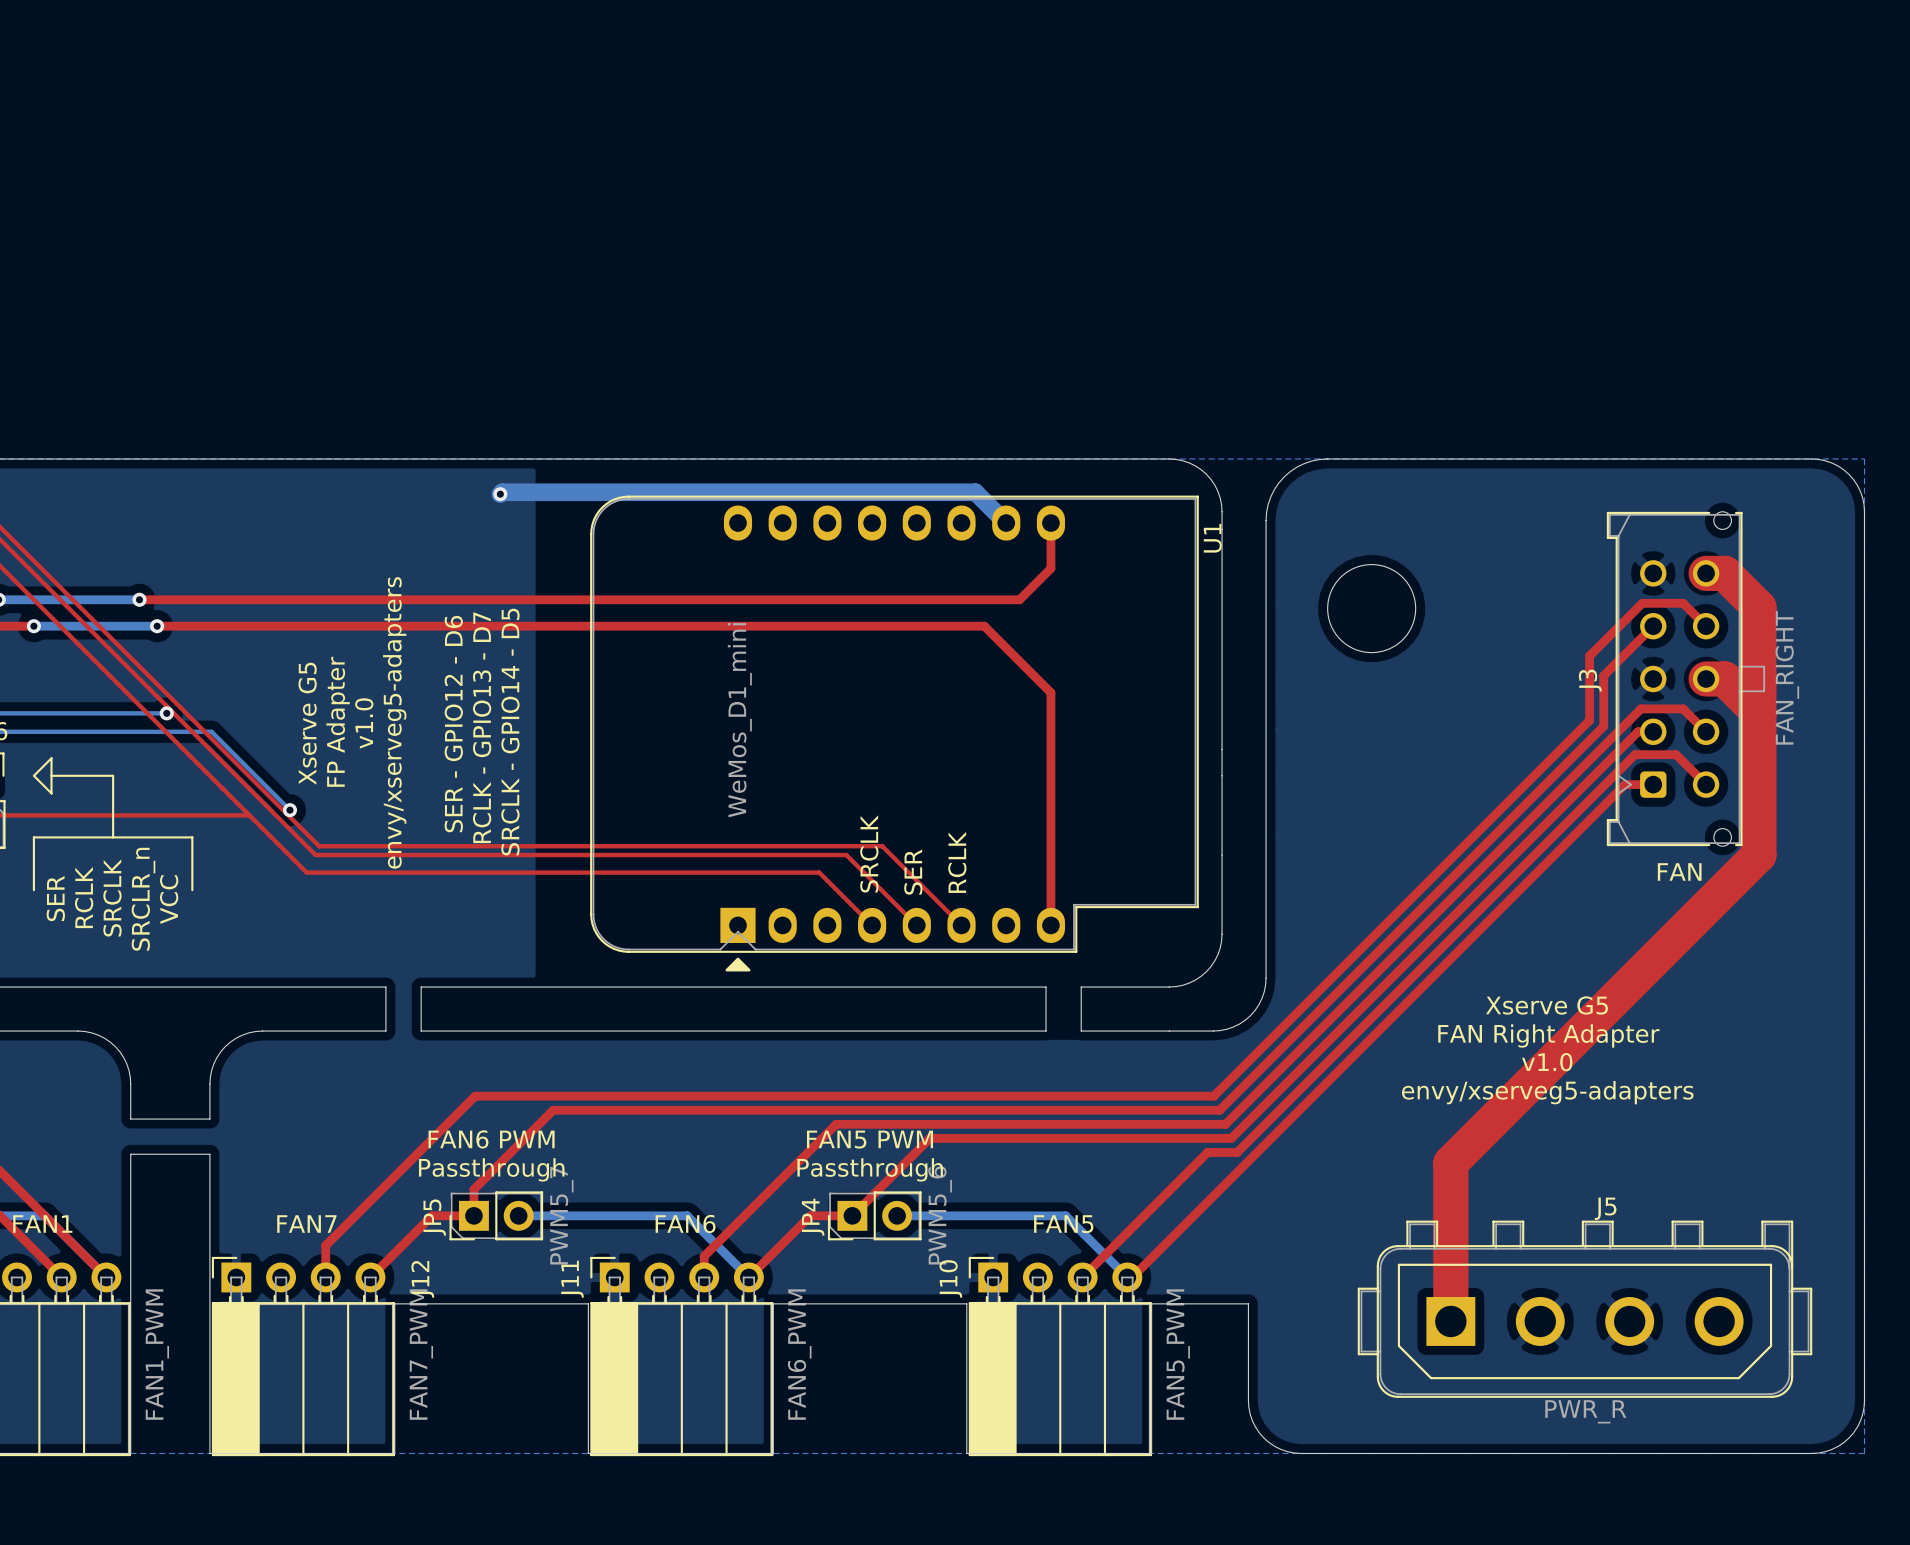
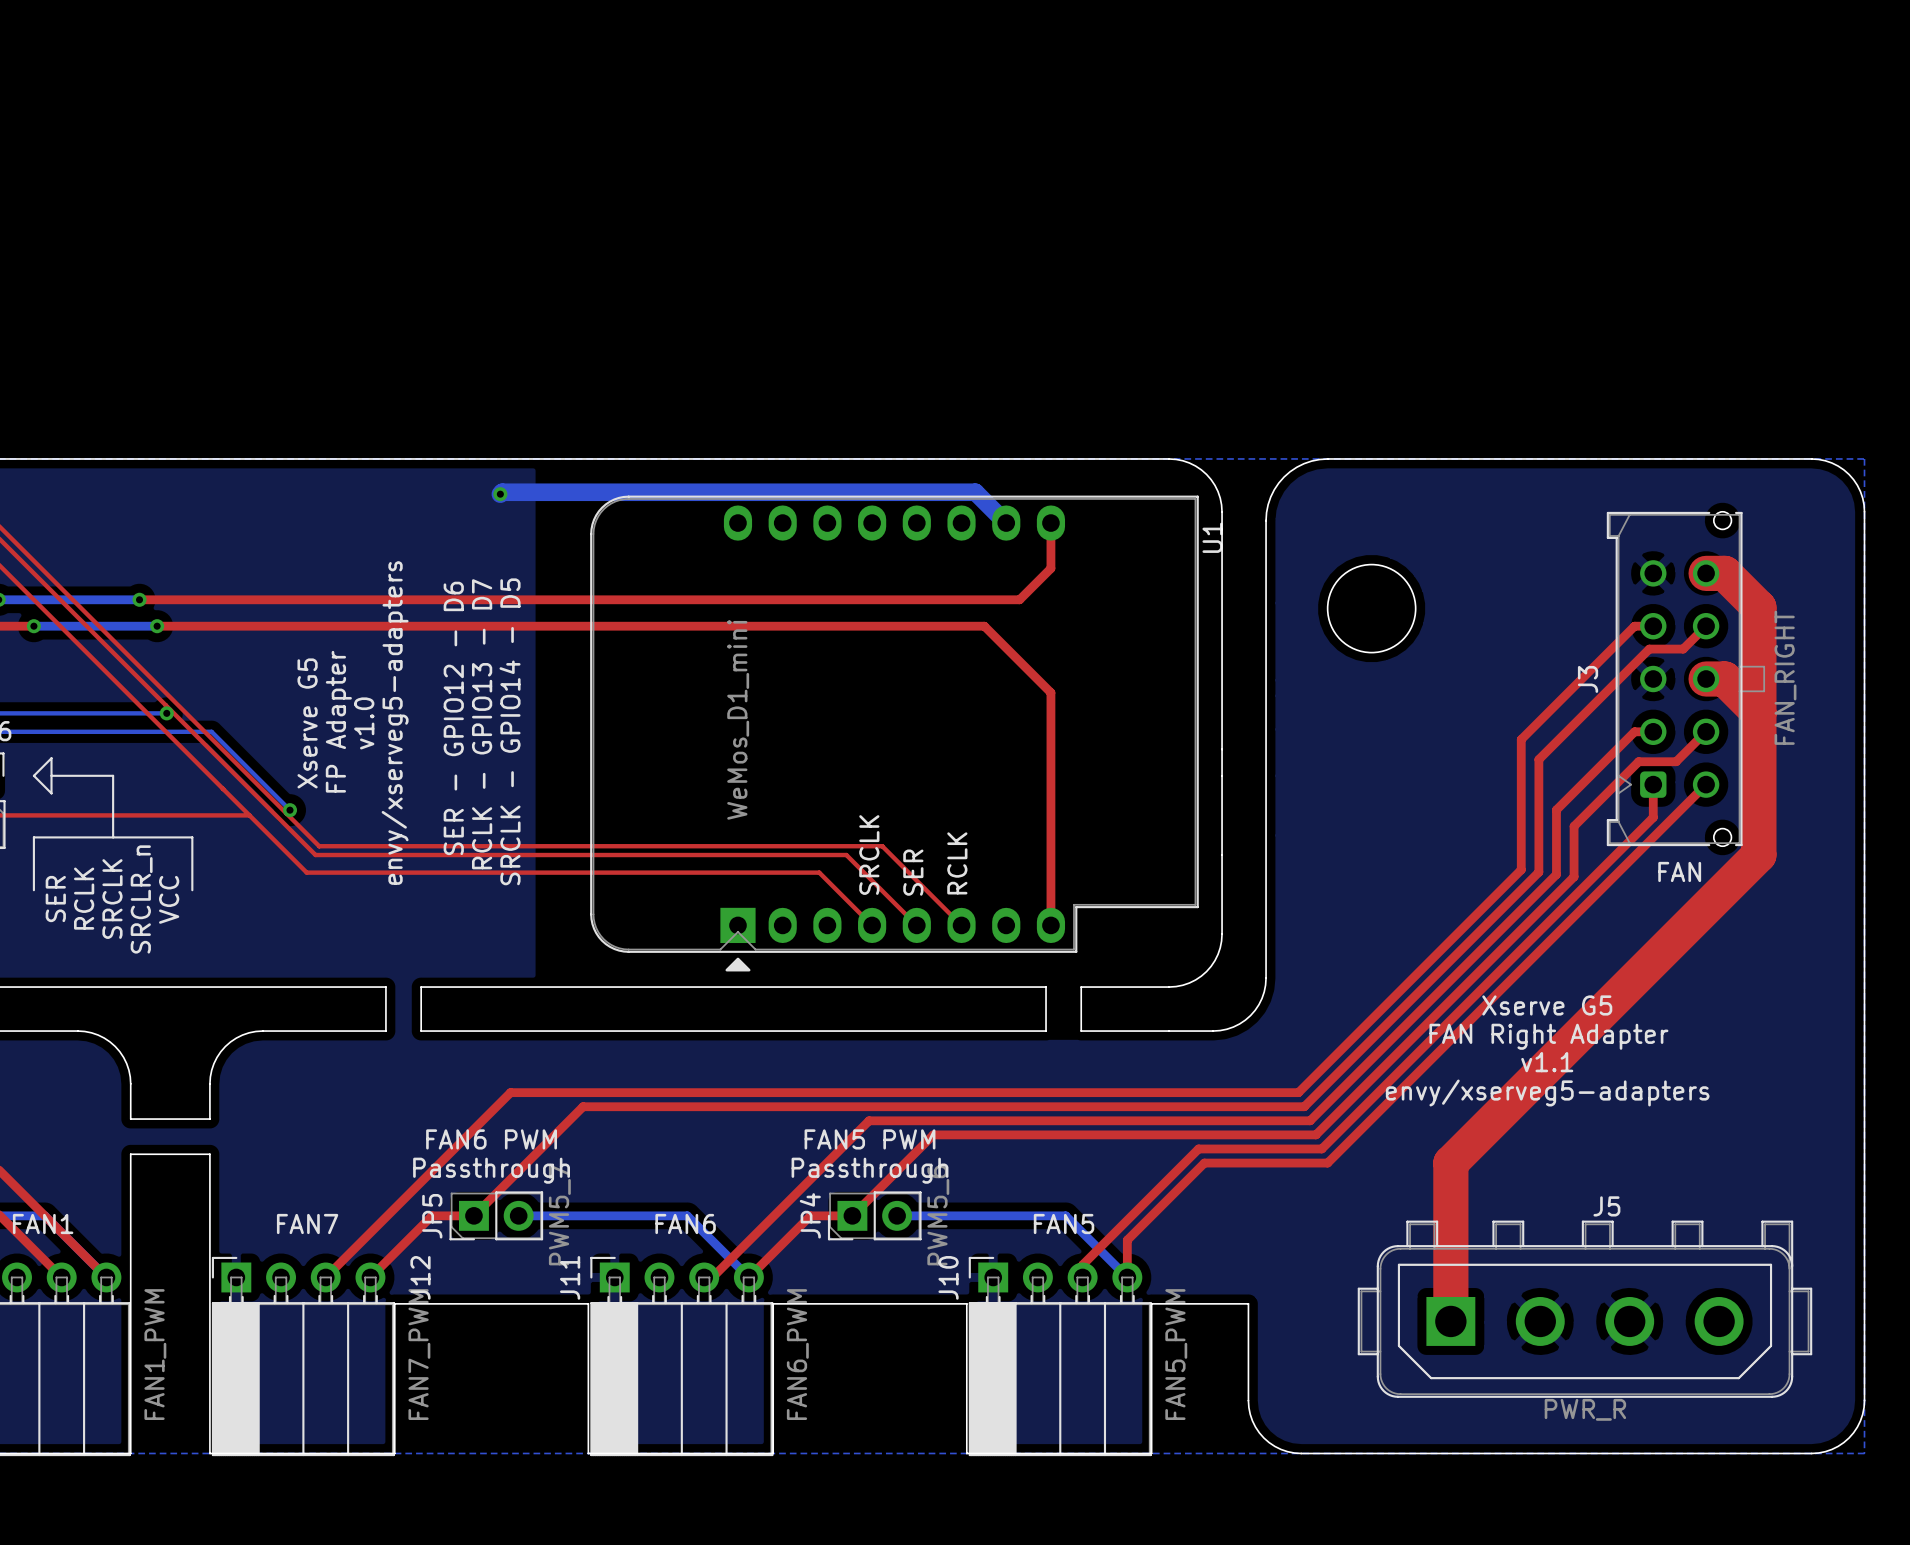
top track: (1653, 626) (1603, 675) (1603, 726) (1219, 1110) (553, 1110) (473, 1189) (473, 1215) -> (1706, 626) (1683, 649) (1649, 649) (1538, 759) (1538, 872) (1304, 1106) (583, 1106) (473, 1215)
top track: (1706, 626) (1683, 603) (1642, 603) (1589, 655) (1589, 720) (1213, 1096) (475, 1096) (325, 1245) (325, 1277) -> (1653, 626) (1634, 626) (1521, 739) (1521, 869) (1298, 1092) (510, 1092) (325, 1277)
top track: (1637, 731) (1231, 1138) (929, 1138) -> (1706, 731) (1676, 761) (1638, 761) (1574, 826) (1574, 876) (1315, 1134) (933, 1134) (929, 1138)
top track: (1706, 731) (1683, 708) (1640, 708) (1225, 1124) (836, 1124) (704, 1256) (704, 1277) -> (1637, 731) (1634, 731) (1556, 809) (1556, 874) (1310, 1120) (869, 1120) (712, 1277) (704, 1277)
top track: (1653, 784) (1625, 784) (1132, 1277) (1127, 1277) -> (1653, 784) (1653, 817) (1321, 1148) (1198, 1148) (1082, 1264) (1082, 1277)
top track: (1706, 784) (1676, 754) (1635, 754) (1237, 1152) (1207, 1152) (1082, 1277) -> (1706, 784) (1327, 1163) (1204, 1163) (1127, 1240) (1127, 1277)
text: v1.0 (1547, 1062) -> v1.1 (1547, 1062)

